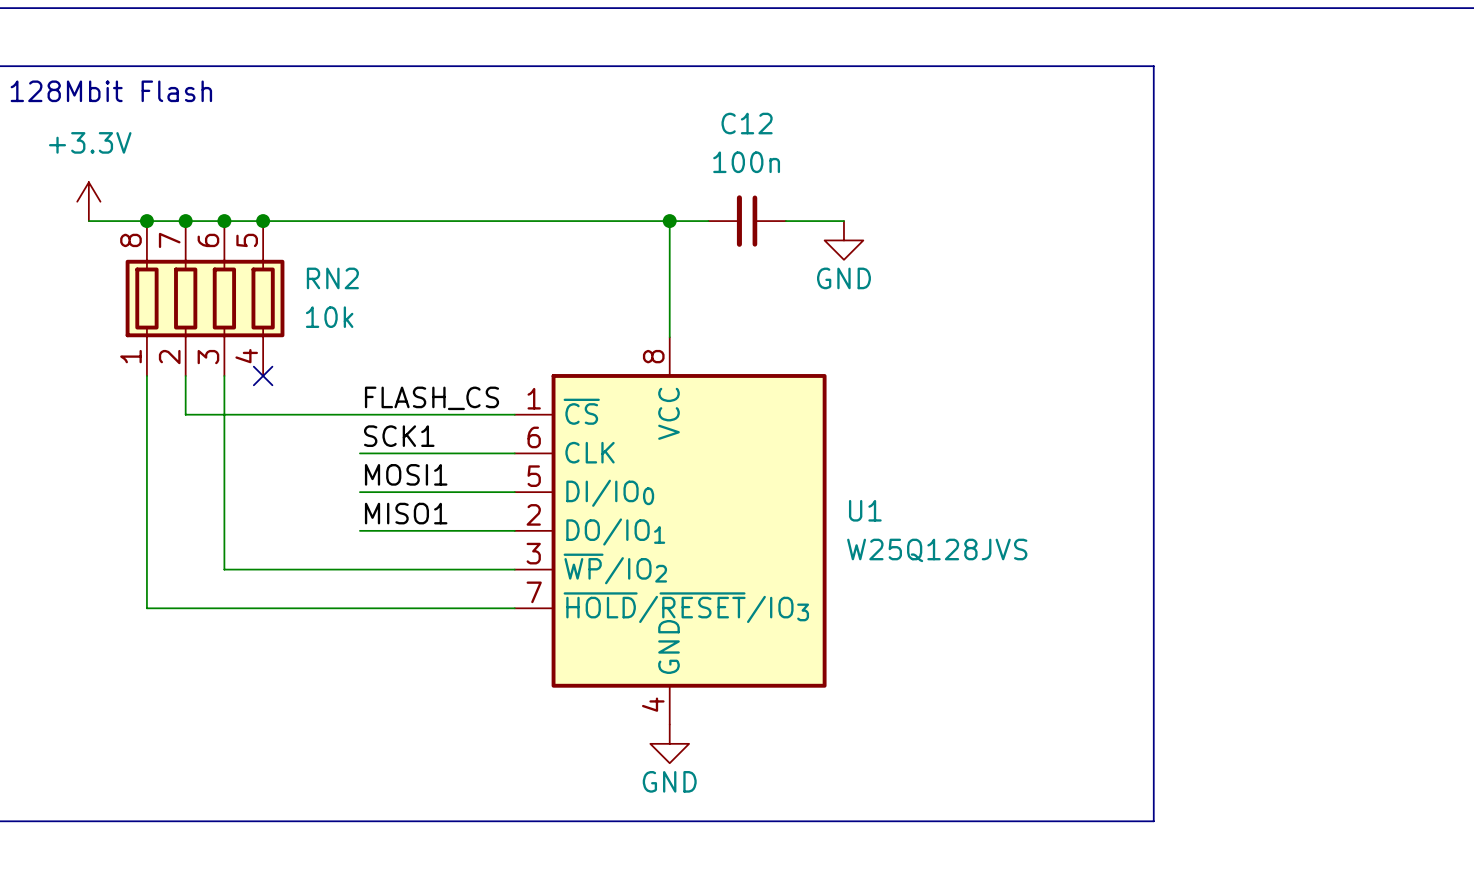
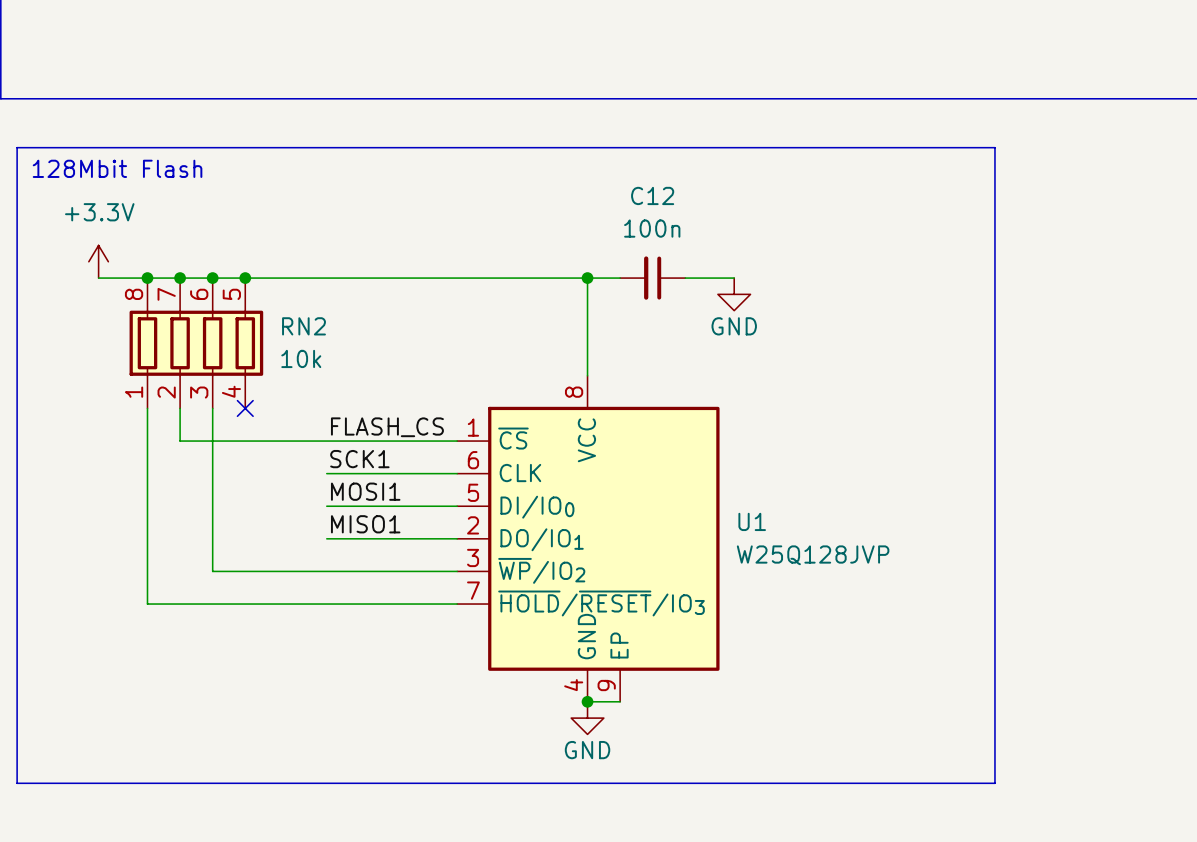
U1 symbol: [514, 337, 827, 725] -> [457, 375, 720, 702]
U1 value: W25Q128JVS (937, 550) -> W25Q128JVP (813, 555)
wire: none -> (587, 701) (620, 701)
junction: none -> (587, 701)

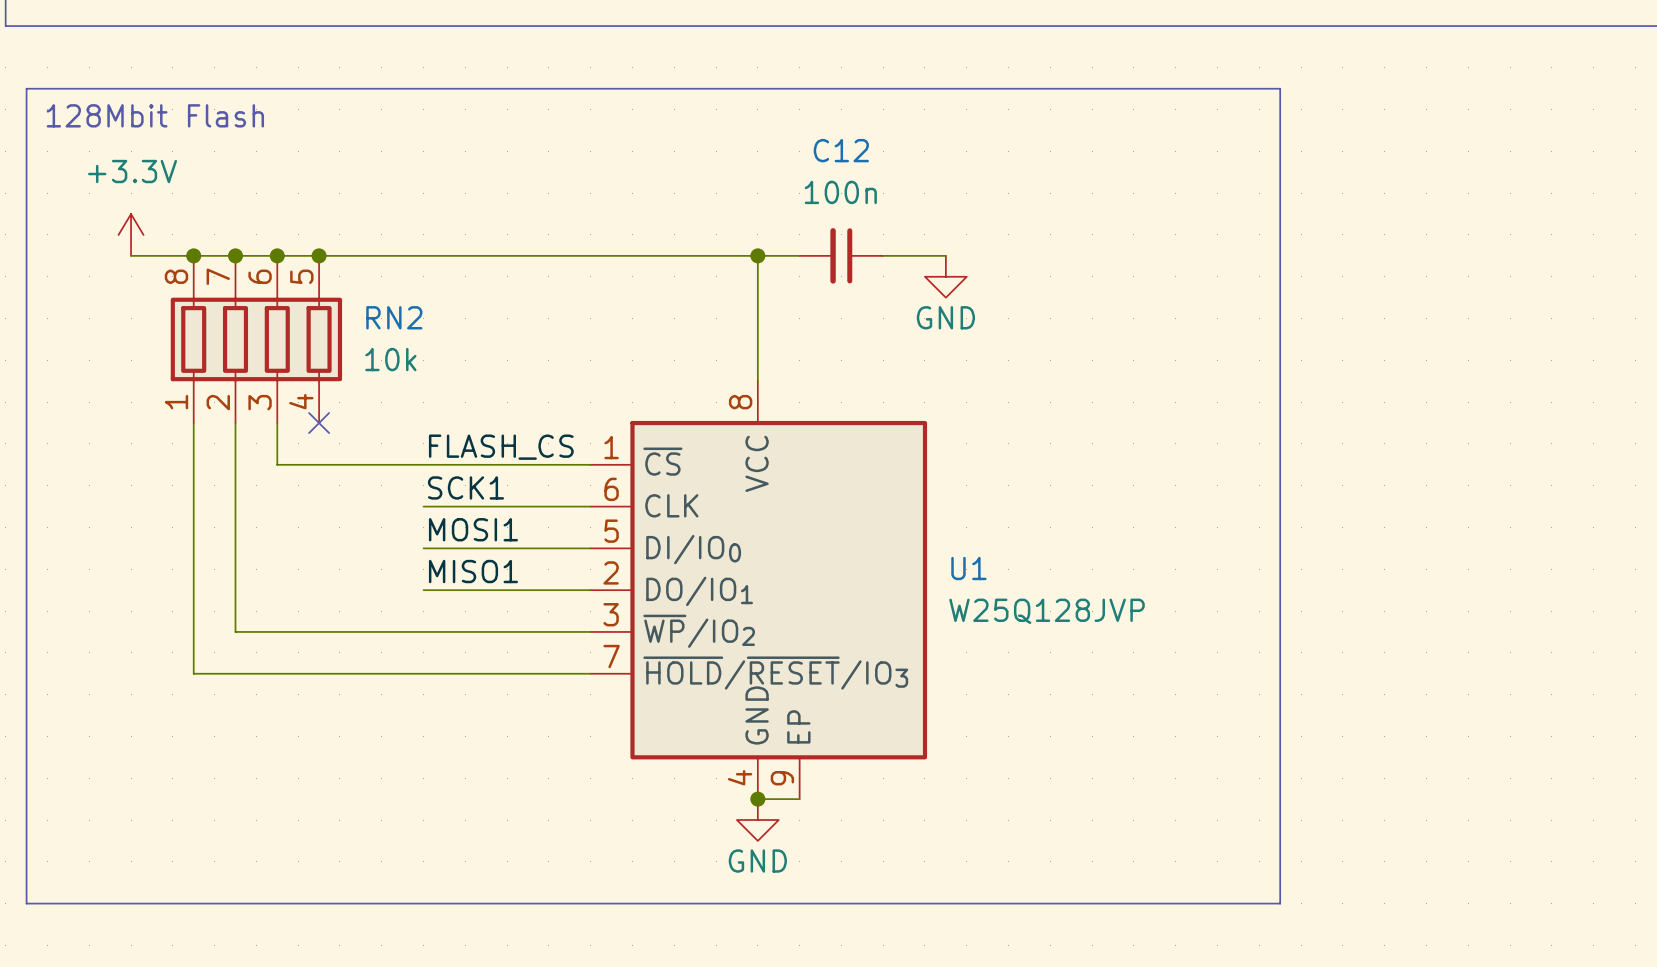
wire: (180, 441) (212, 441) (212, 571) -> (235, 464) (235, 631) (277, 631)

